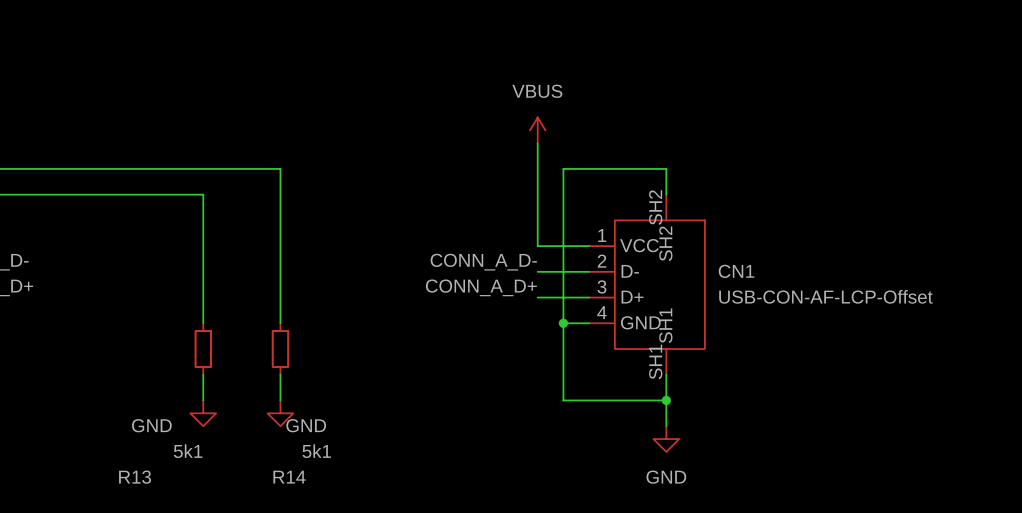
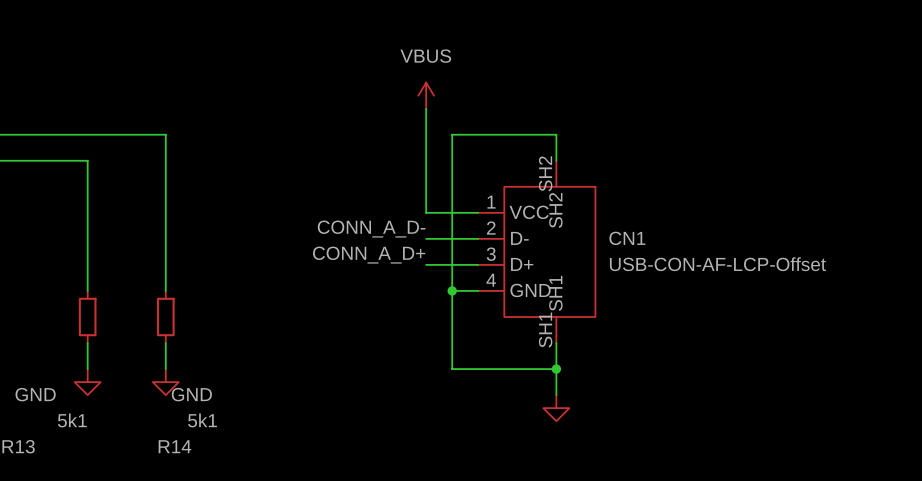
power symbol text: GND (666, 477) -> none

